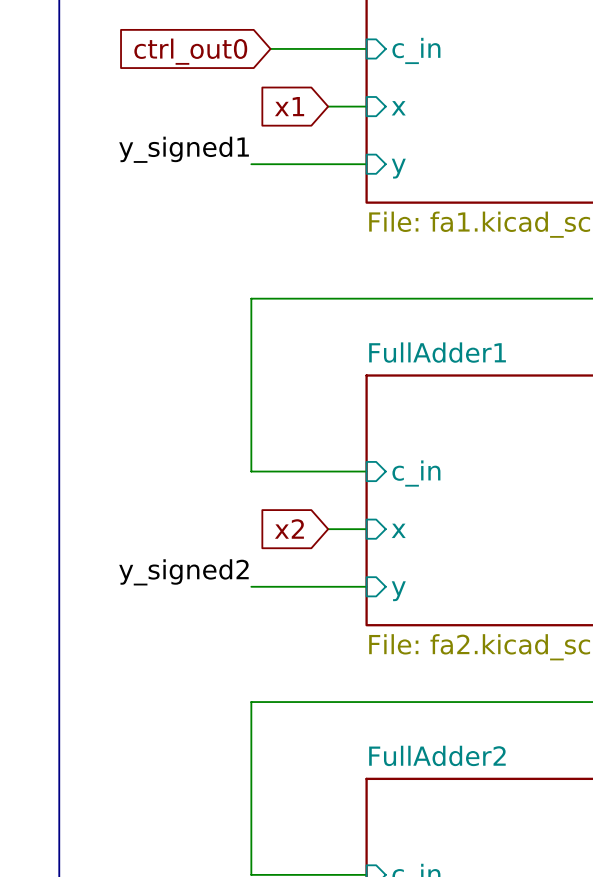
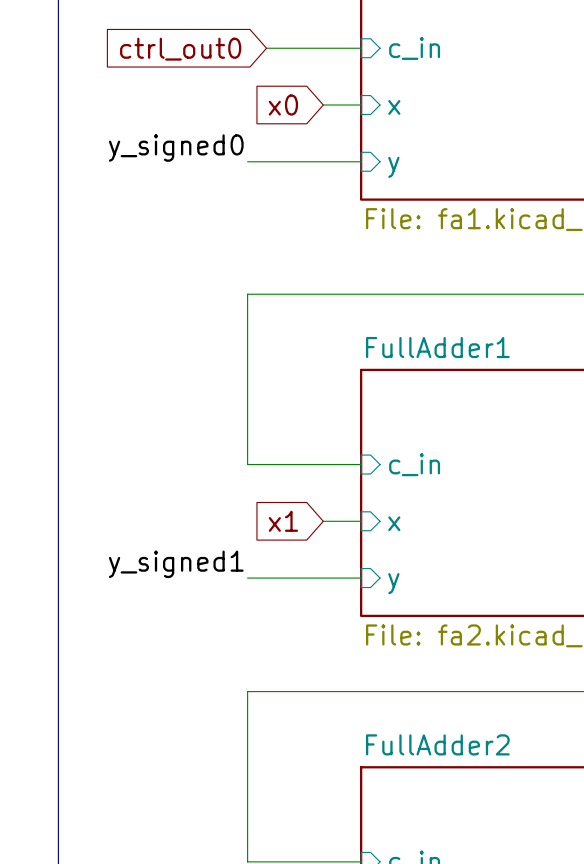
global label: x1 (289, 106) -> x0 (283, 105)
label: y_signed1 (184, 149) -> y_signed0 (176, 148)
global label: x2 (289, 528) -> x1 (283, 521)
label: y_signed2 (183, 572) -> y_signed1 (176, 564)

